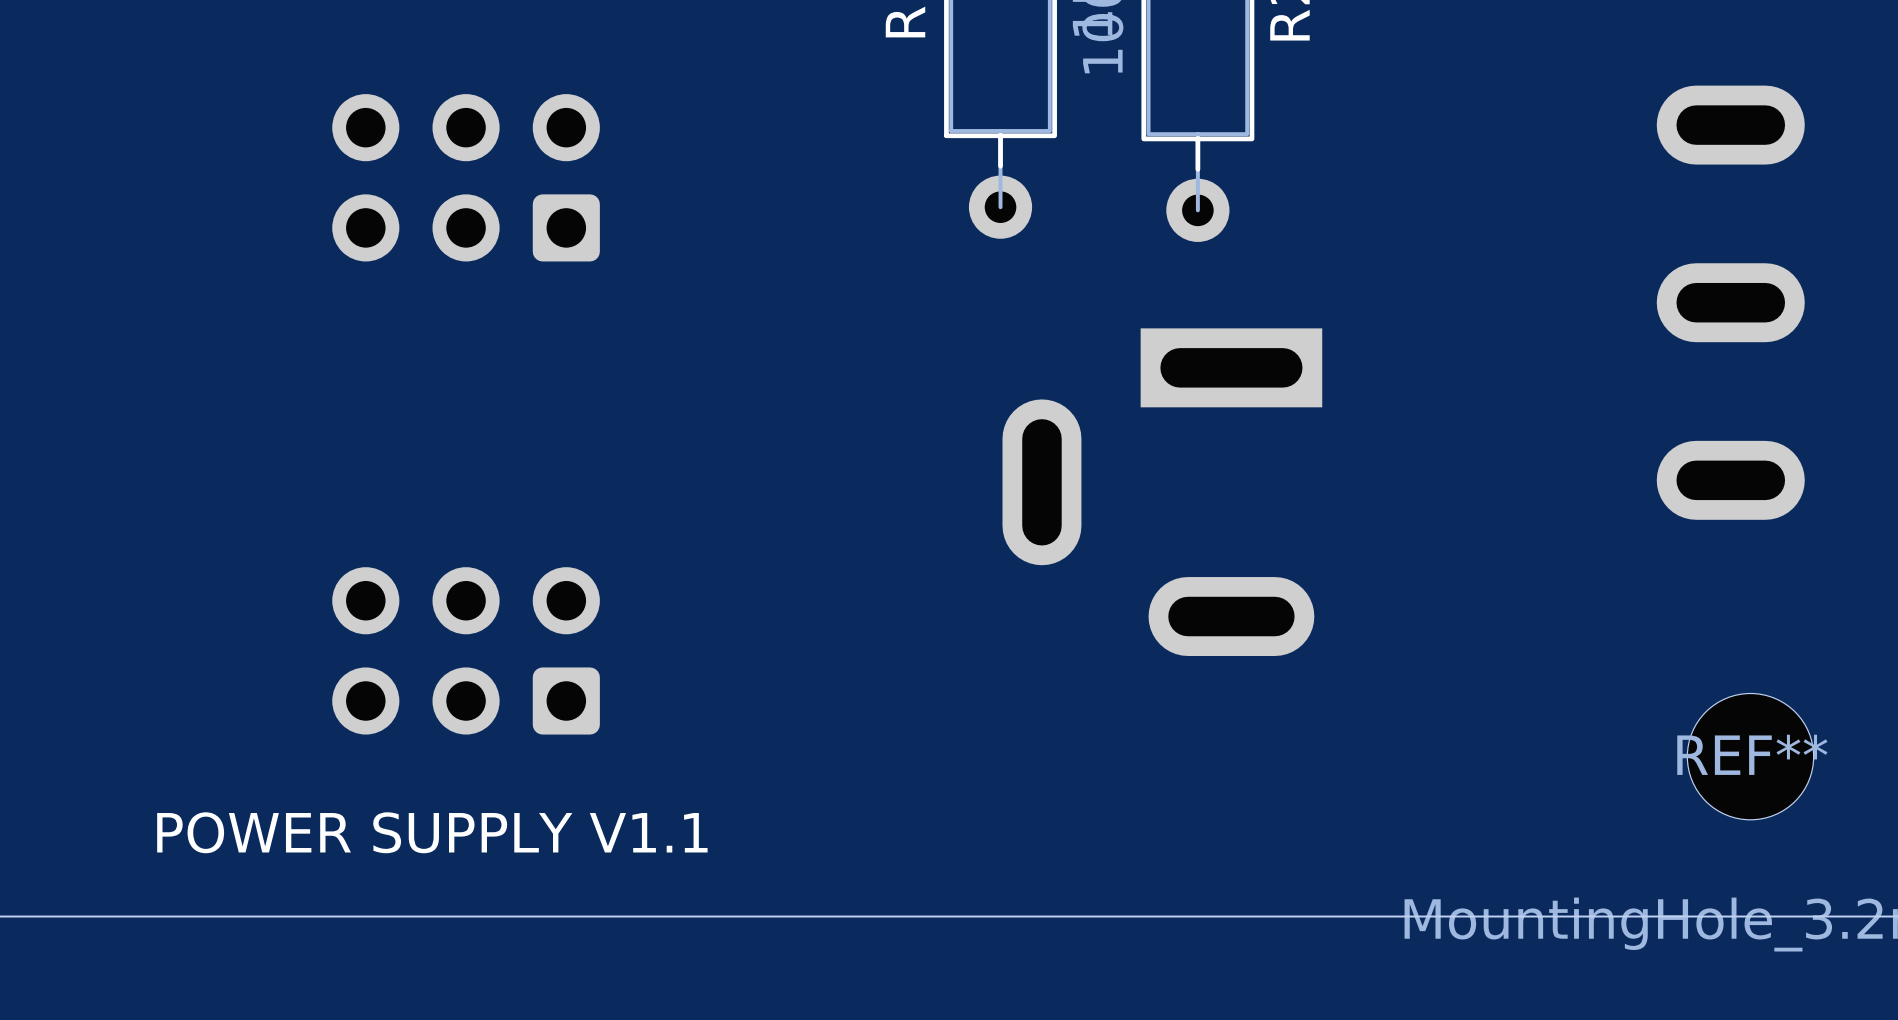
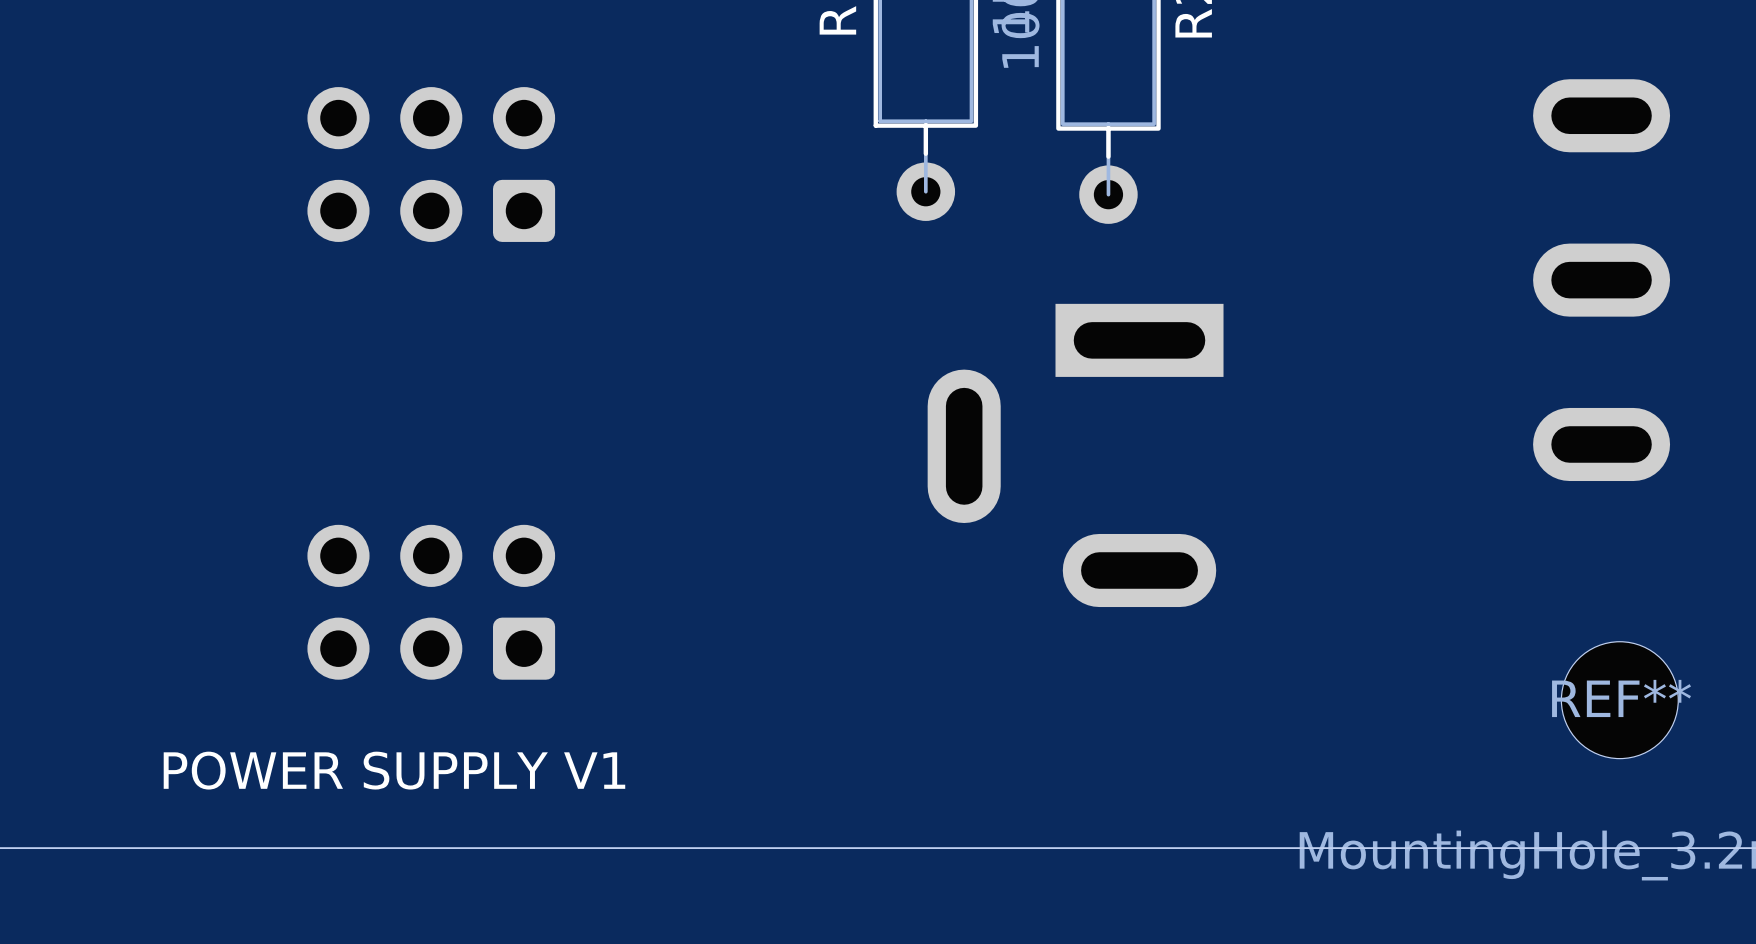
text: POWER SUPPLY V1.1 (432, 832) -> POWER SUPPLY V1 (394, 770)

